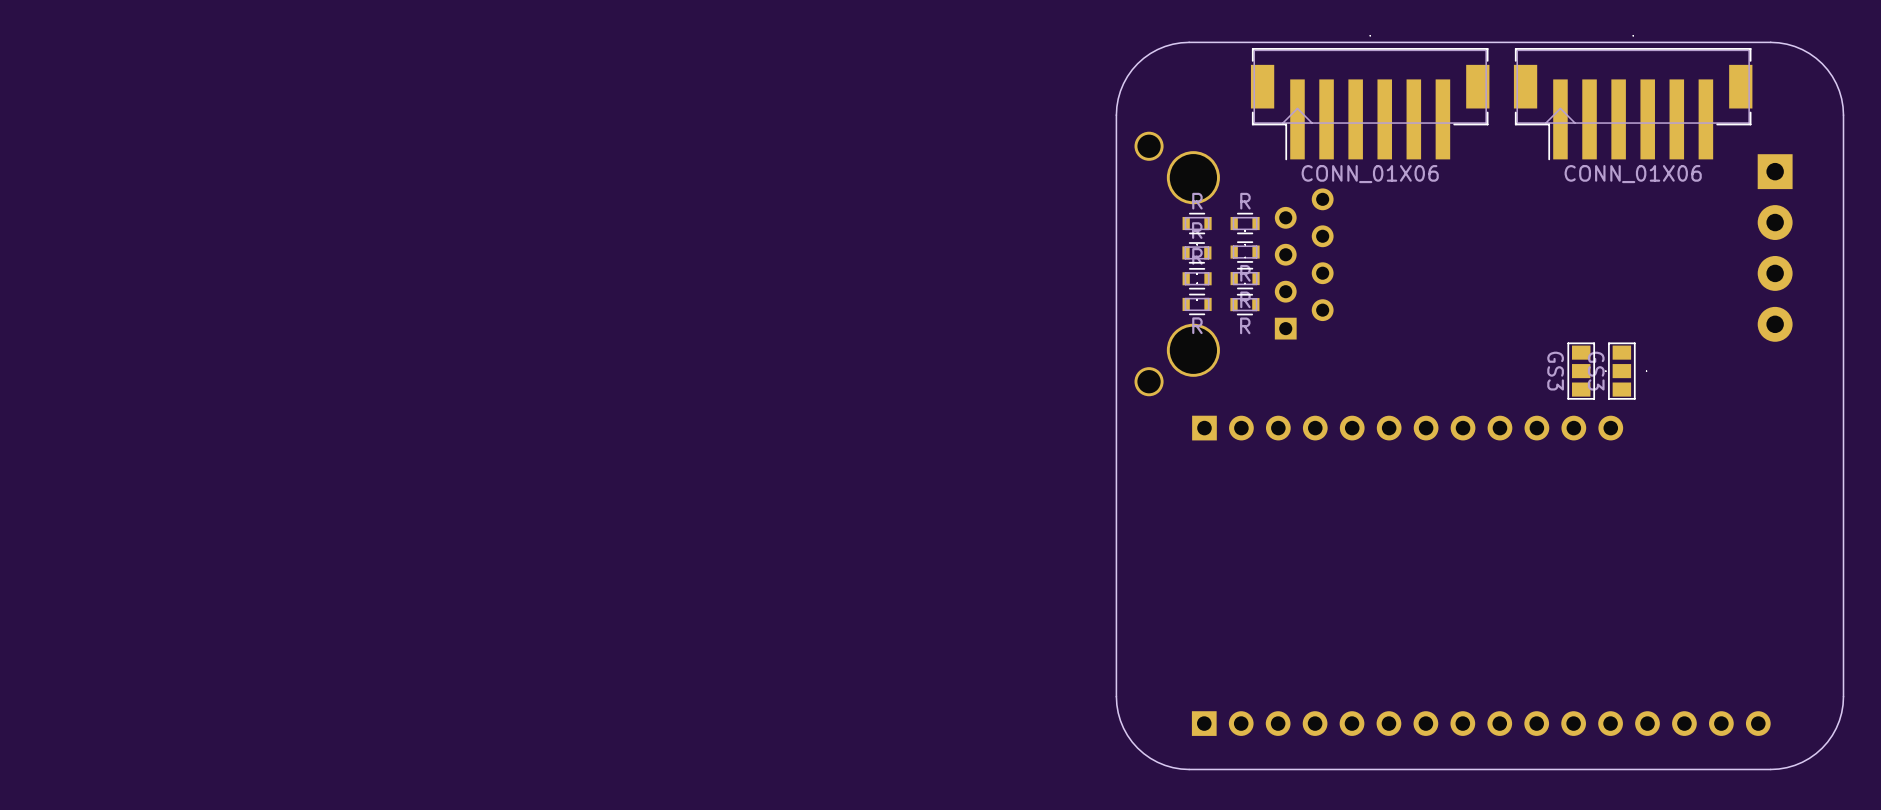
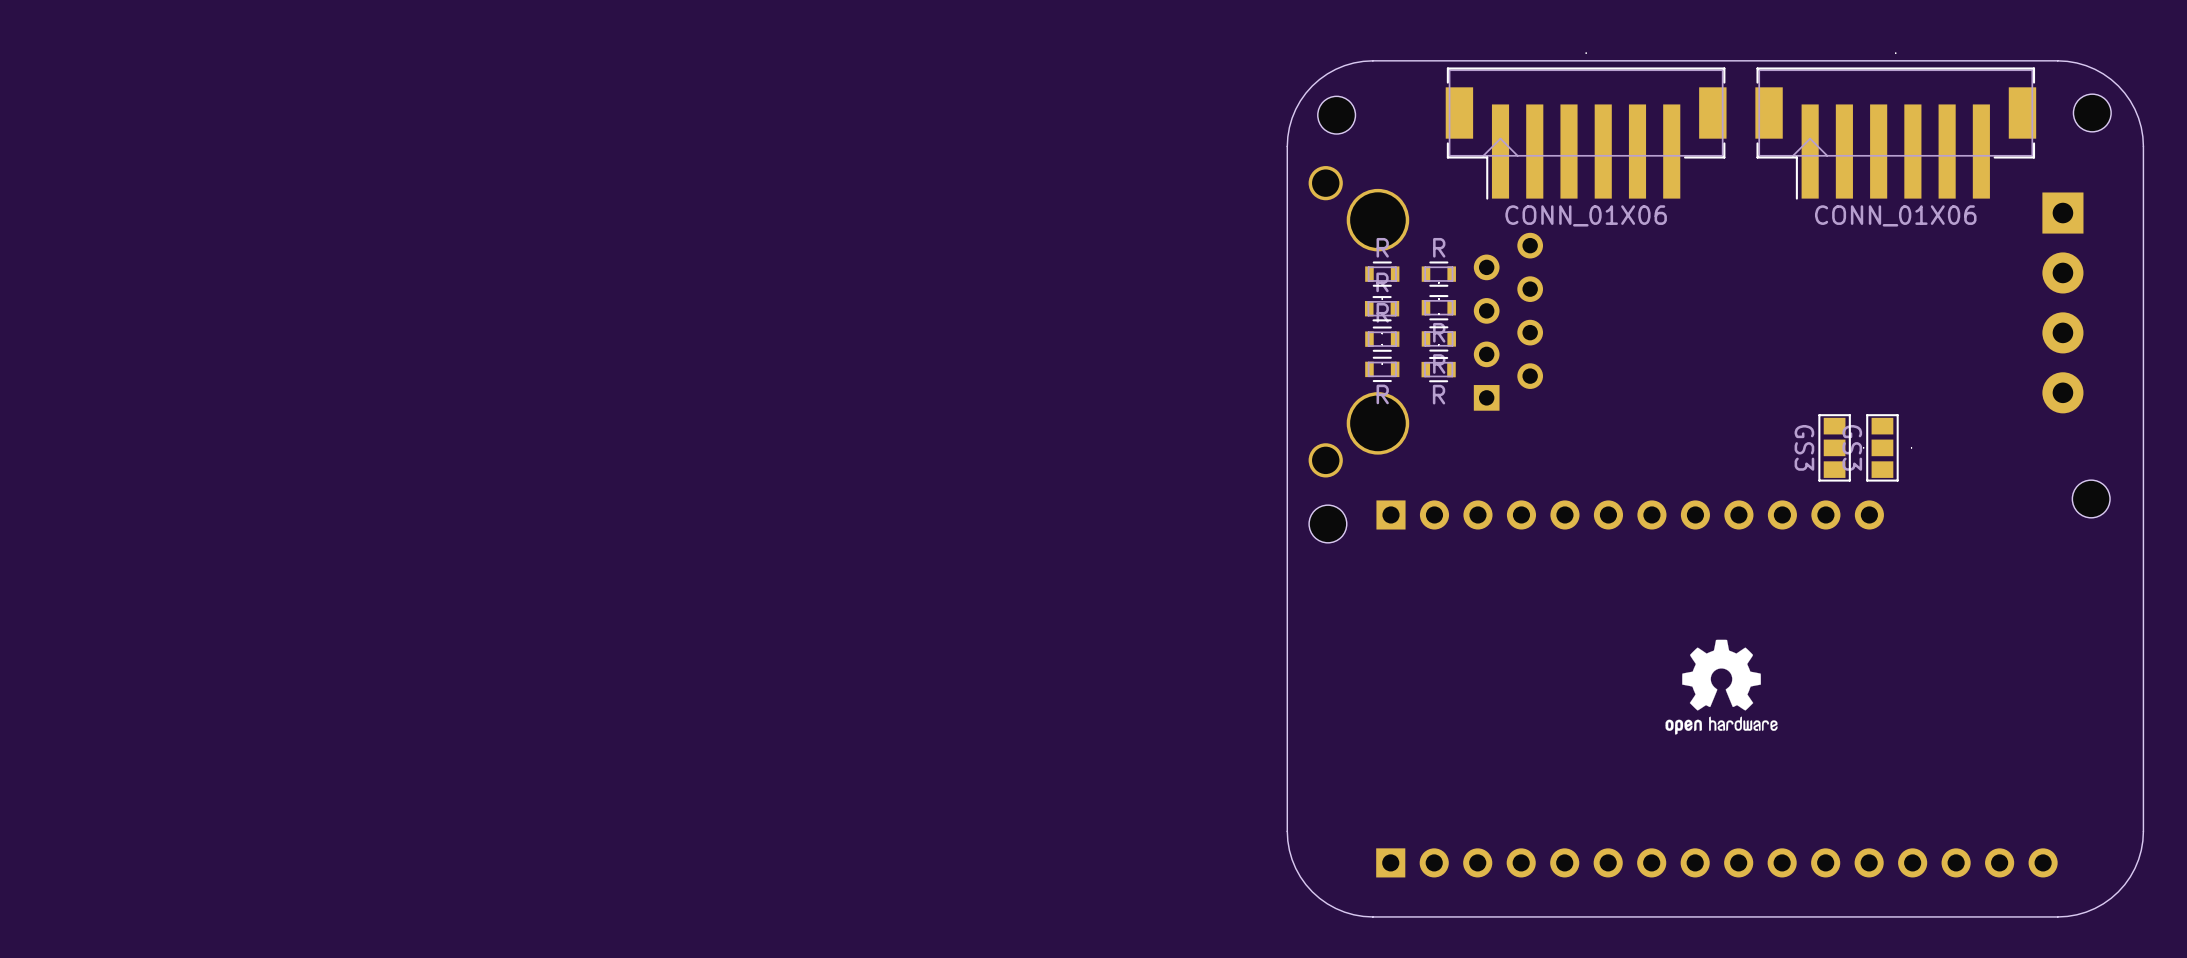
part: none -> (2092, 113)
part: none -> (1336, 115)
part: none -> (2091, 498)
part: none -> (1327, 523)
drawing: none -> [1665, 639, 1778, 735]

